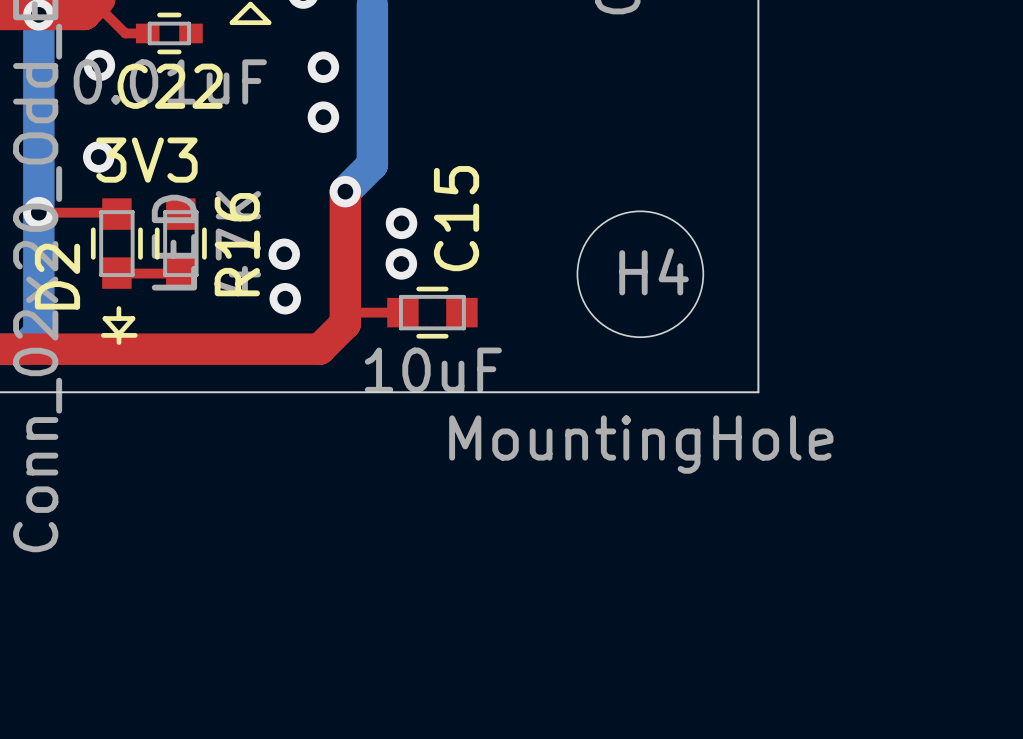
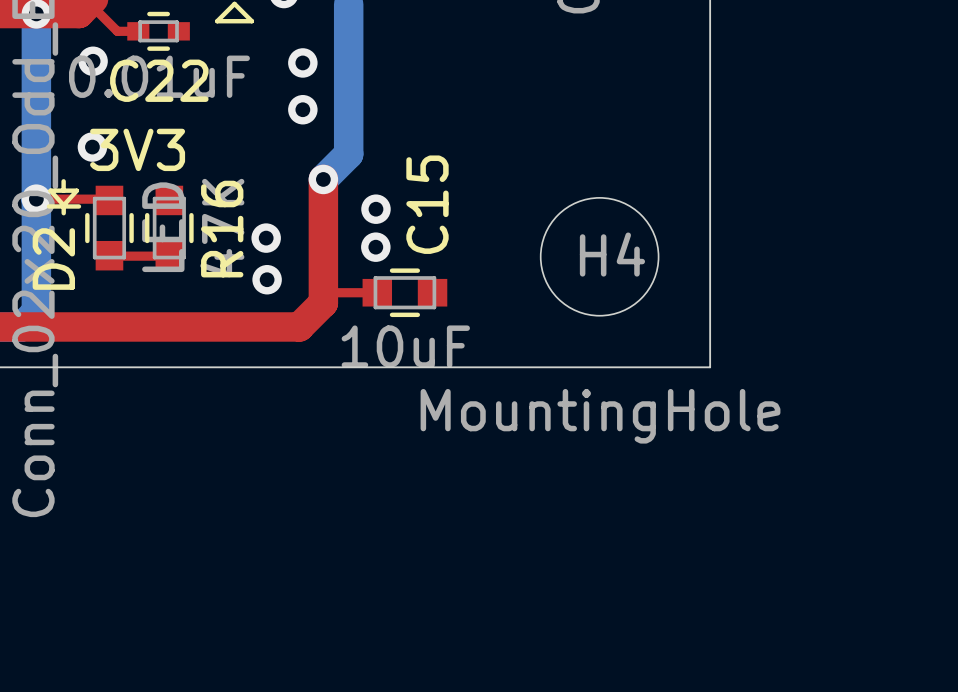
line: none -> (50, 190) (76, 190)
line: none -> (50, 190) (63, 205)
line: none -> (76, 190) (63, 205)
line: (118, 308) (118, 318) -> (63, 181) (63, 190)
line: (119, 334) (119, 342) -> (63, 205) (63, 213)
line: (119, 334) (132, 318) (104, 318) (119, 334) -> none
line: (103, 335) (135, 335) -> (49, 206) (78, 206)

